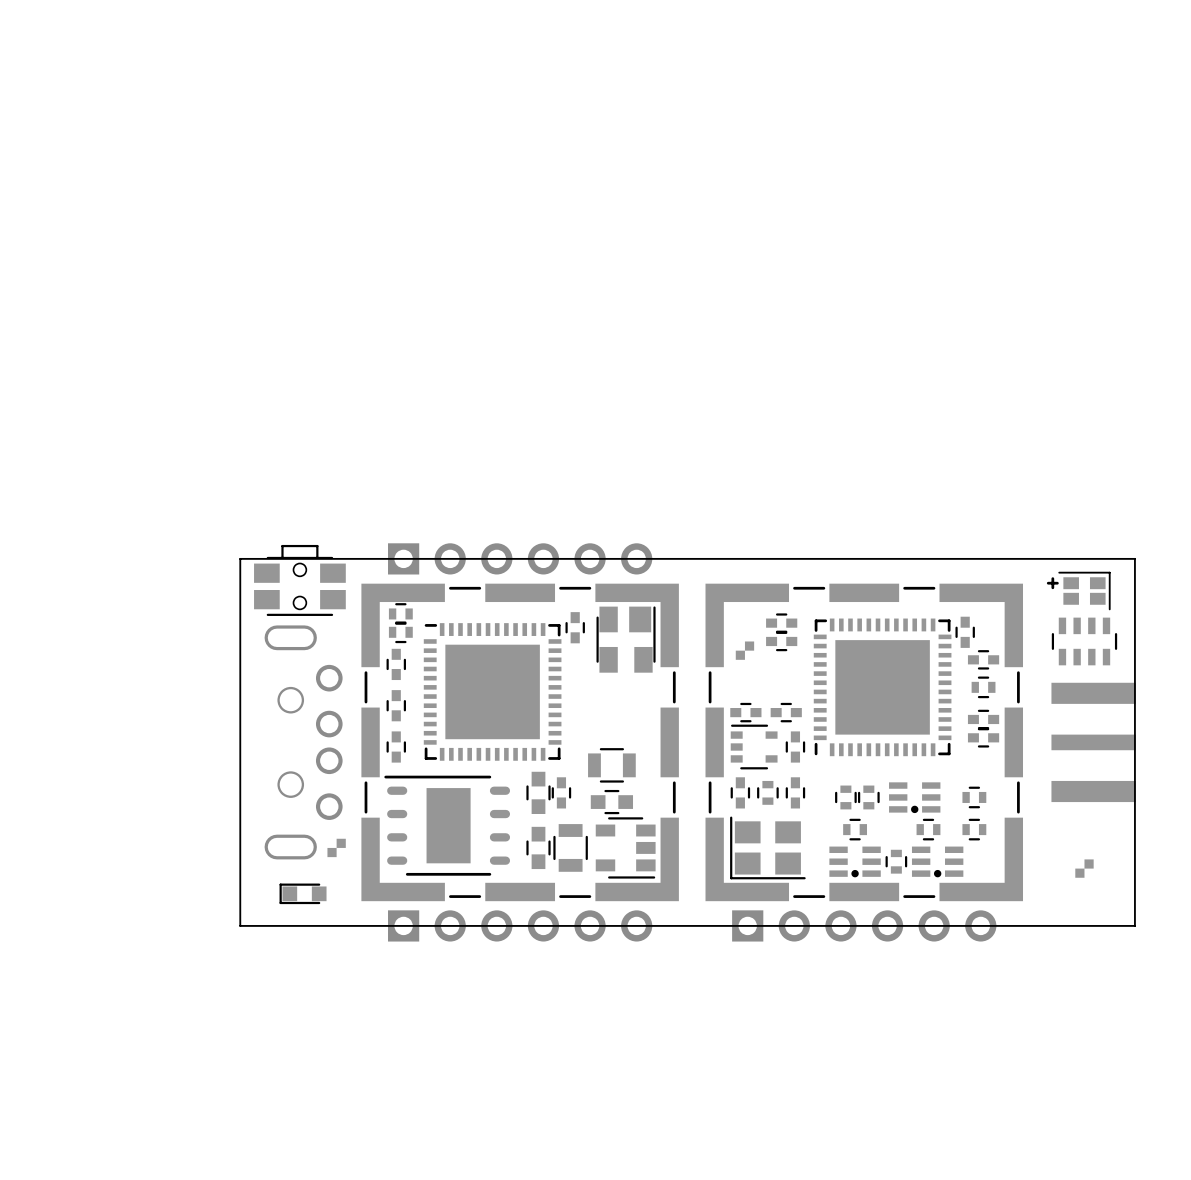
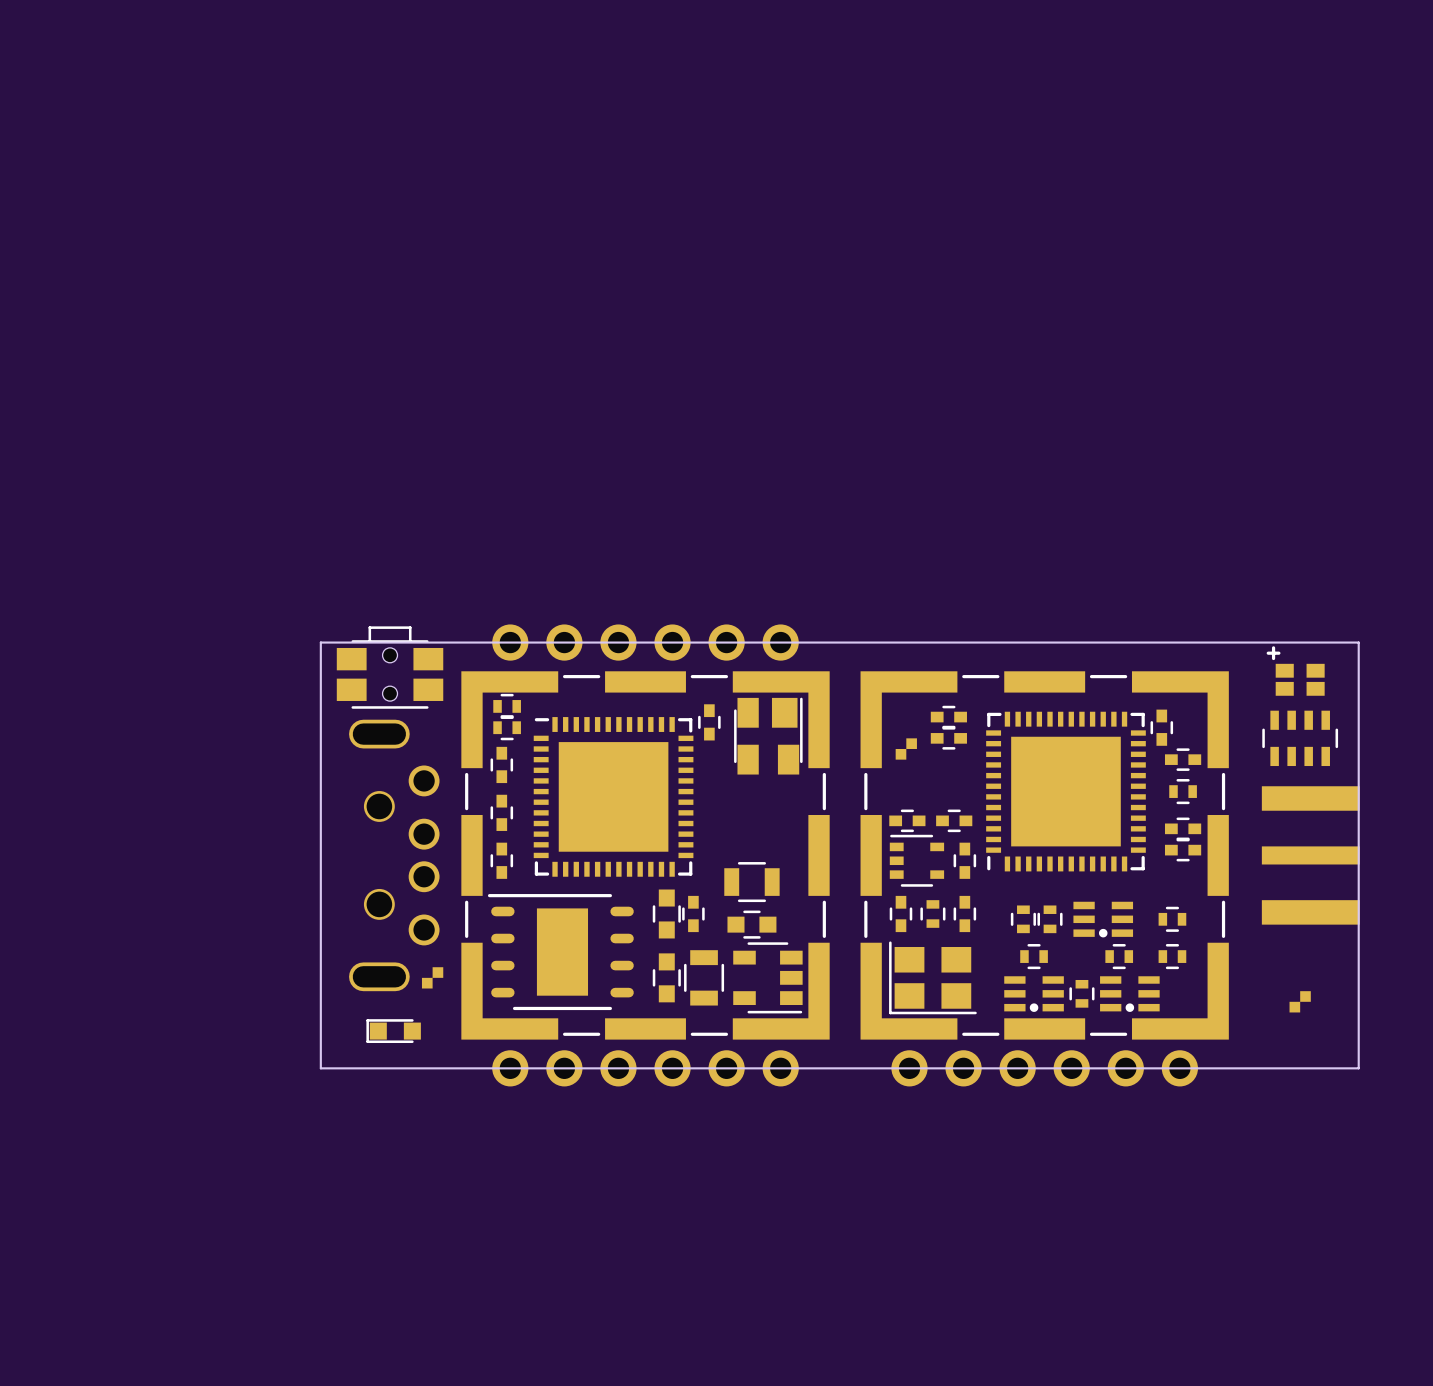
part footprint: [388, 543, 653, 575] -> [492, 624, 799, 661]
part footprint: [1046, 571, 1111, 611] -> [1266, 646, 1325, 696]
part footprint: [388, 910, 653, 942] -> [492, 1050, 799, 1087]
part footprint: [732, 910, 997, 942] -> [891, 1050, 1198, 1087]

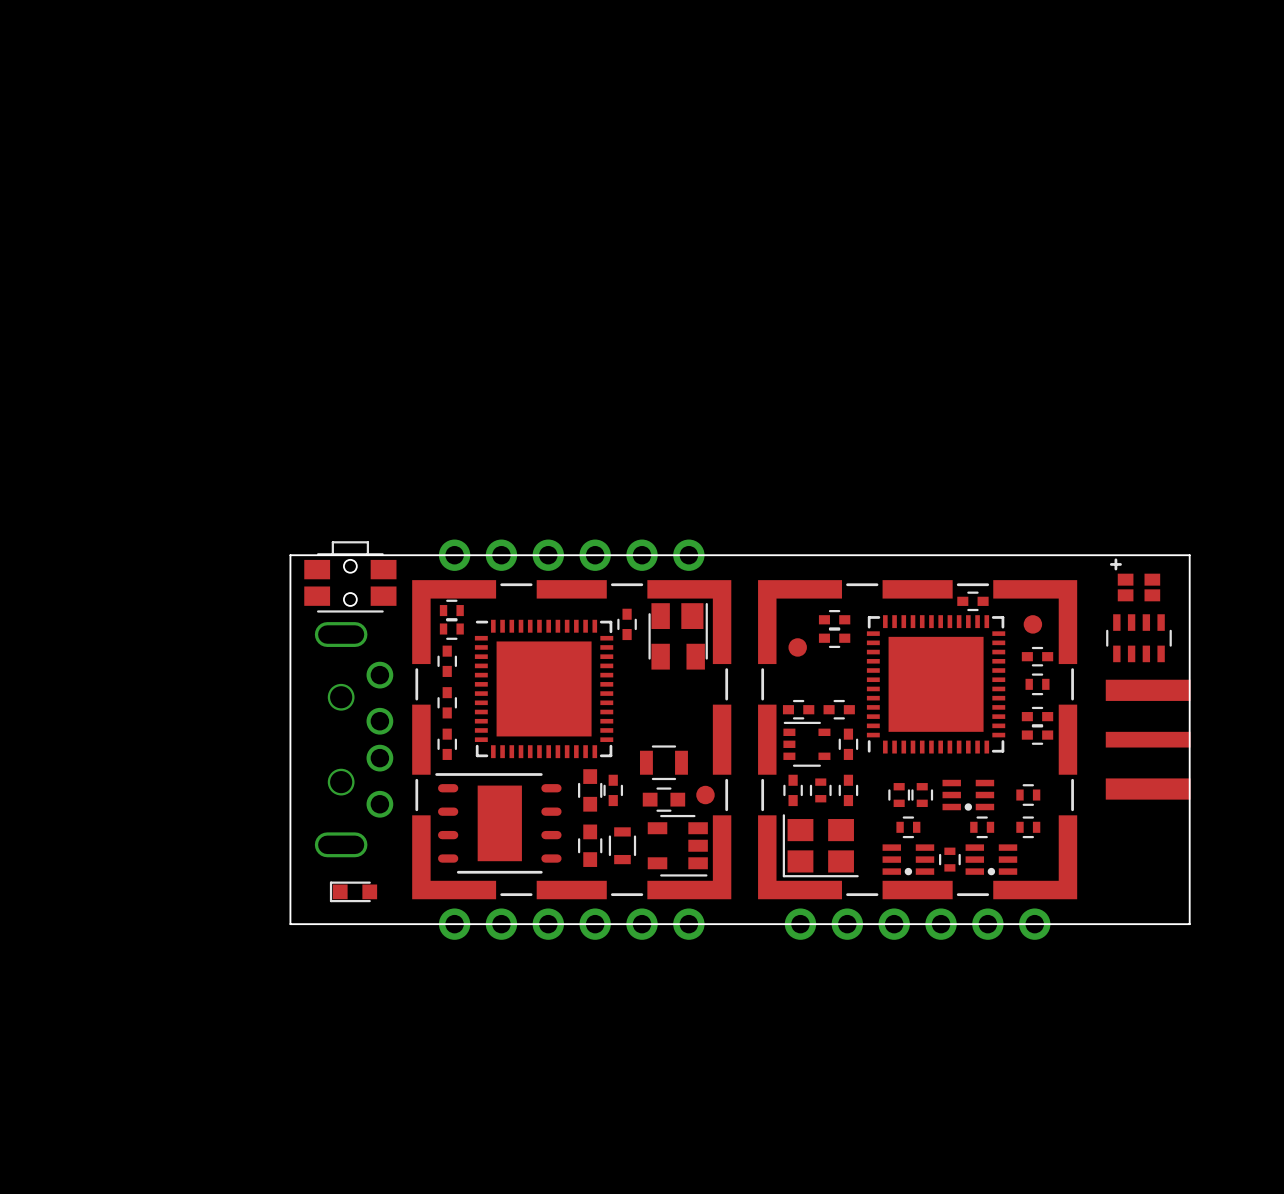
part: none -> (972, 601)
part footprint: [1150, 709, 1174, 746] -> [1023, 615, 1043, 634]
part footprint: [895, 738, 917, 760] -> [788, 638, 807, 657]
part: none -> (705, 795)
part footprint: [684, 950, 725, 1006] -> [608, 827, 637, 865]
part: (432, 977) -> none
part: (1300, 1001) -> none

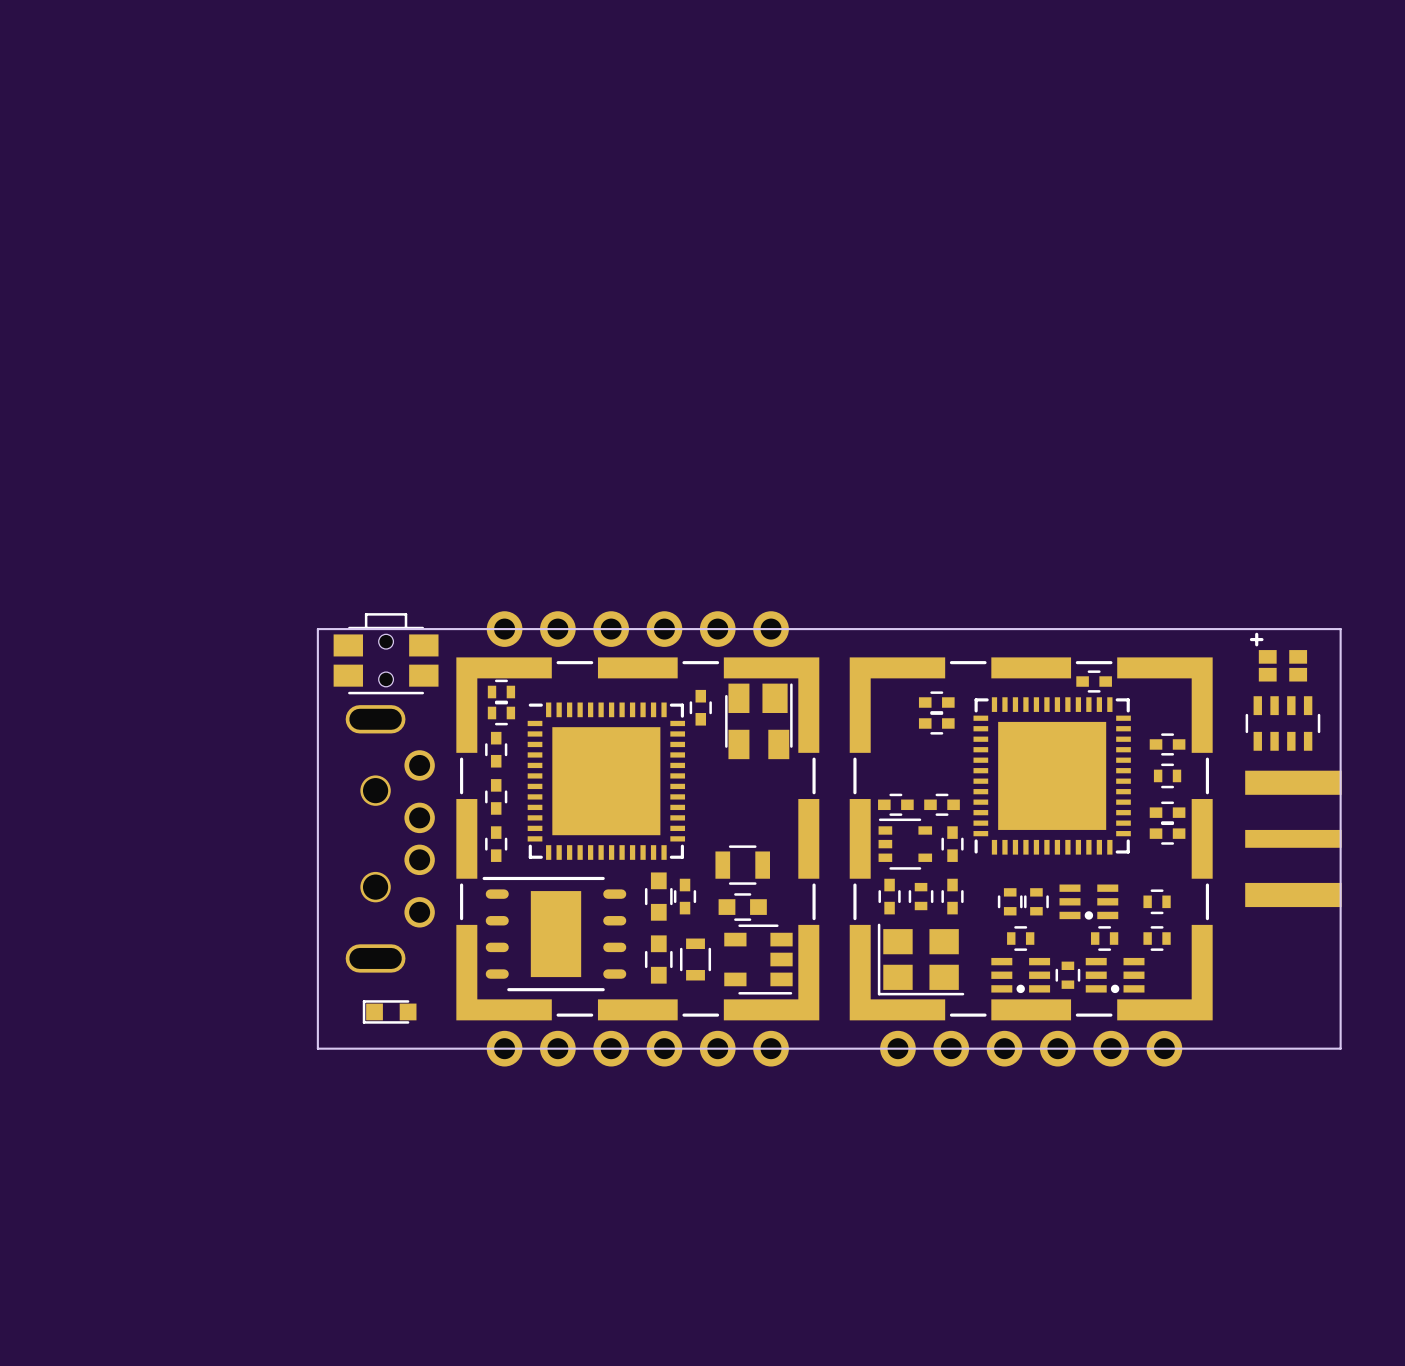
part: (1032, 624) -> none
part: (797, 647) -> none
part: (705, 795) -> none

